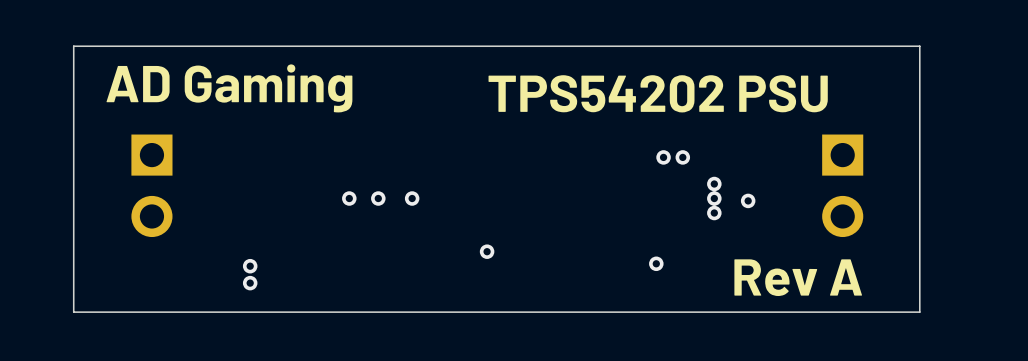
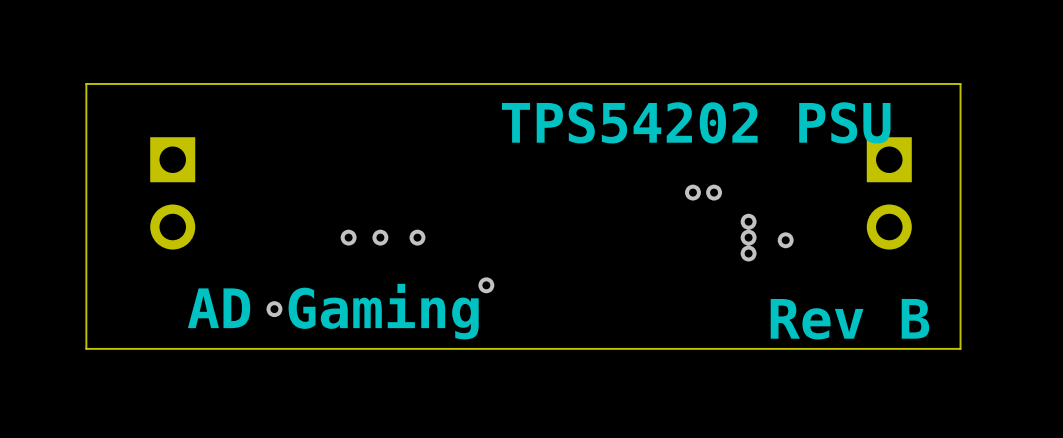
board edge: (919, 46) (73, 46) (73, 312) (919, 312) (919, 46) -> (960, 83) (960, 348) (86, 348) (86, 83) (960, 83)
text position: AD Gaming (229, 88) -> AD Gaming (333, 311)
part position: (151, 185) -> (172, 193)
part position: (842, 185) -> (889, 193)
via position: (487, 251) -> (486, 285)
via: none -> (274, 309)
via: (656, 263) -> none
via: (250, 266) -> none
text: Rev A (798, 277) -> Rev B (849, 319)
via: (250, 283) -> none

